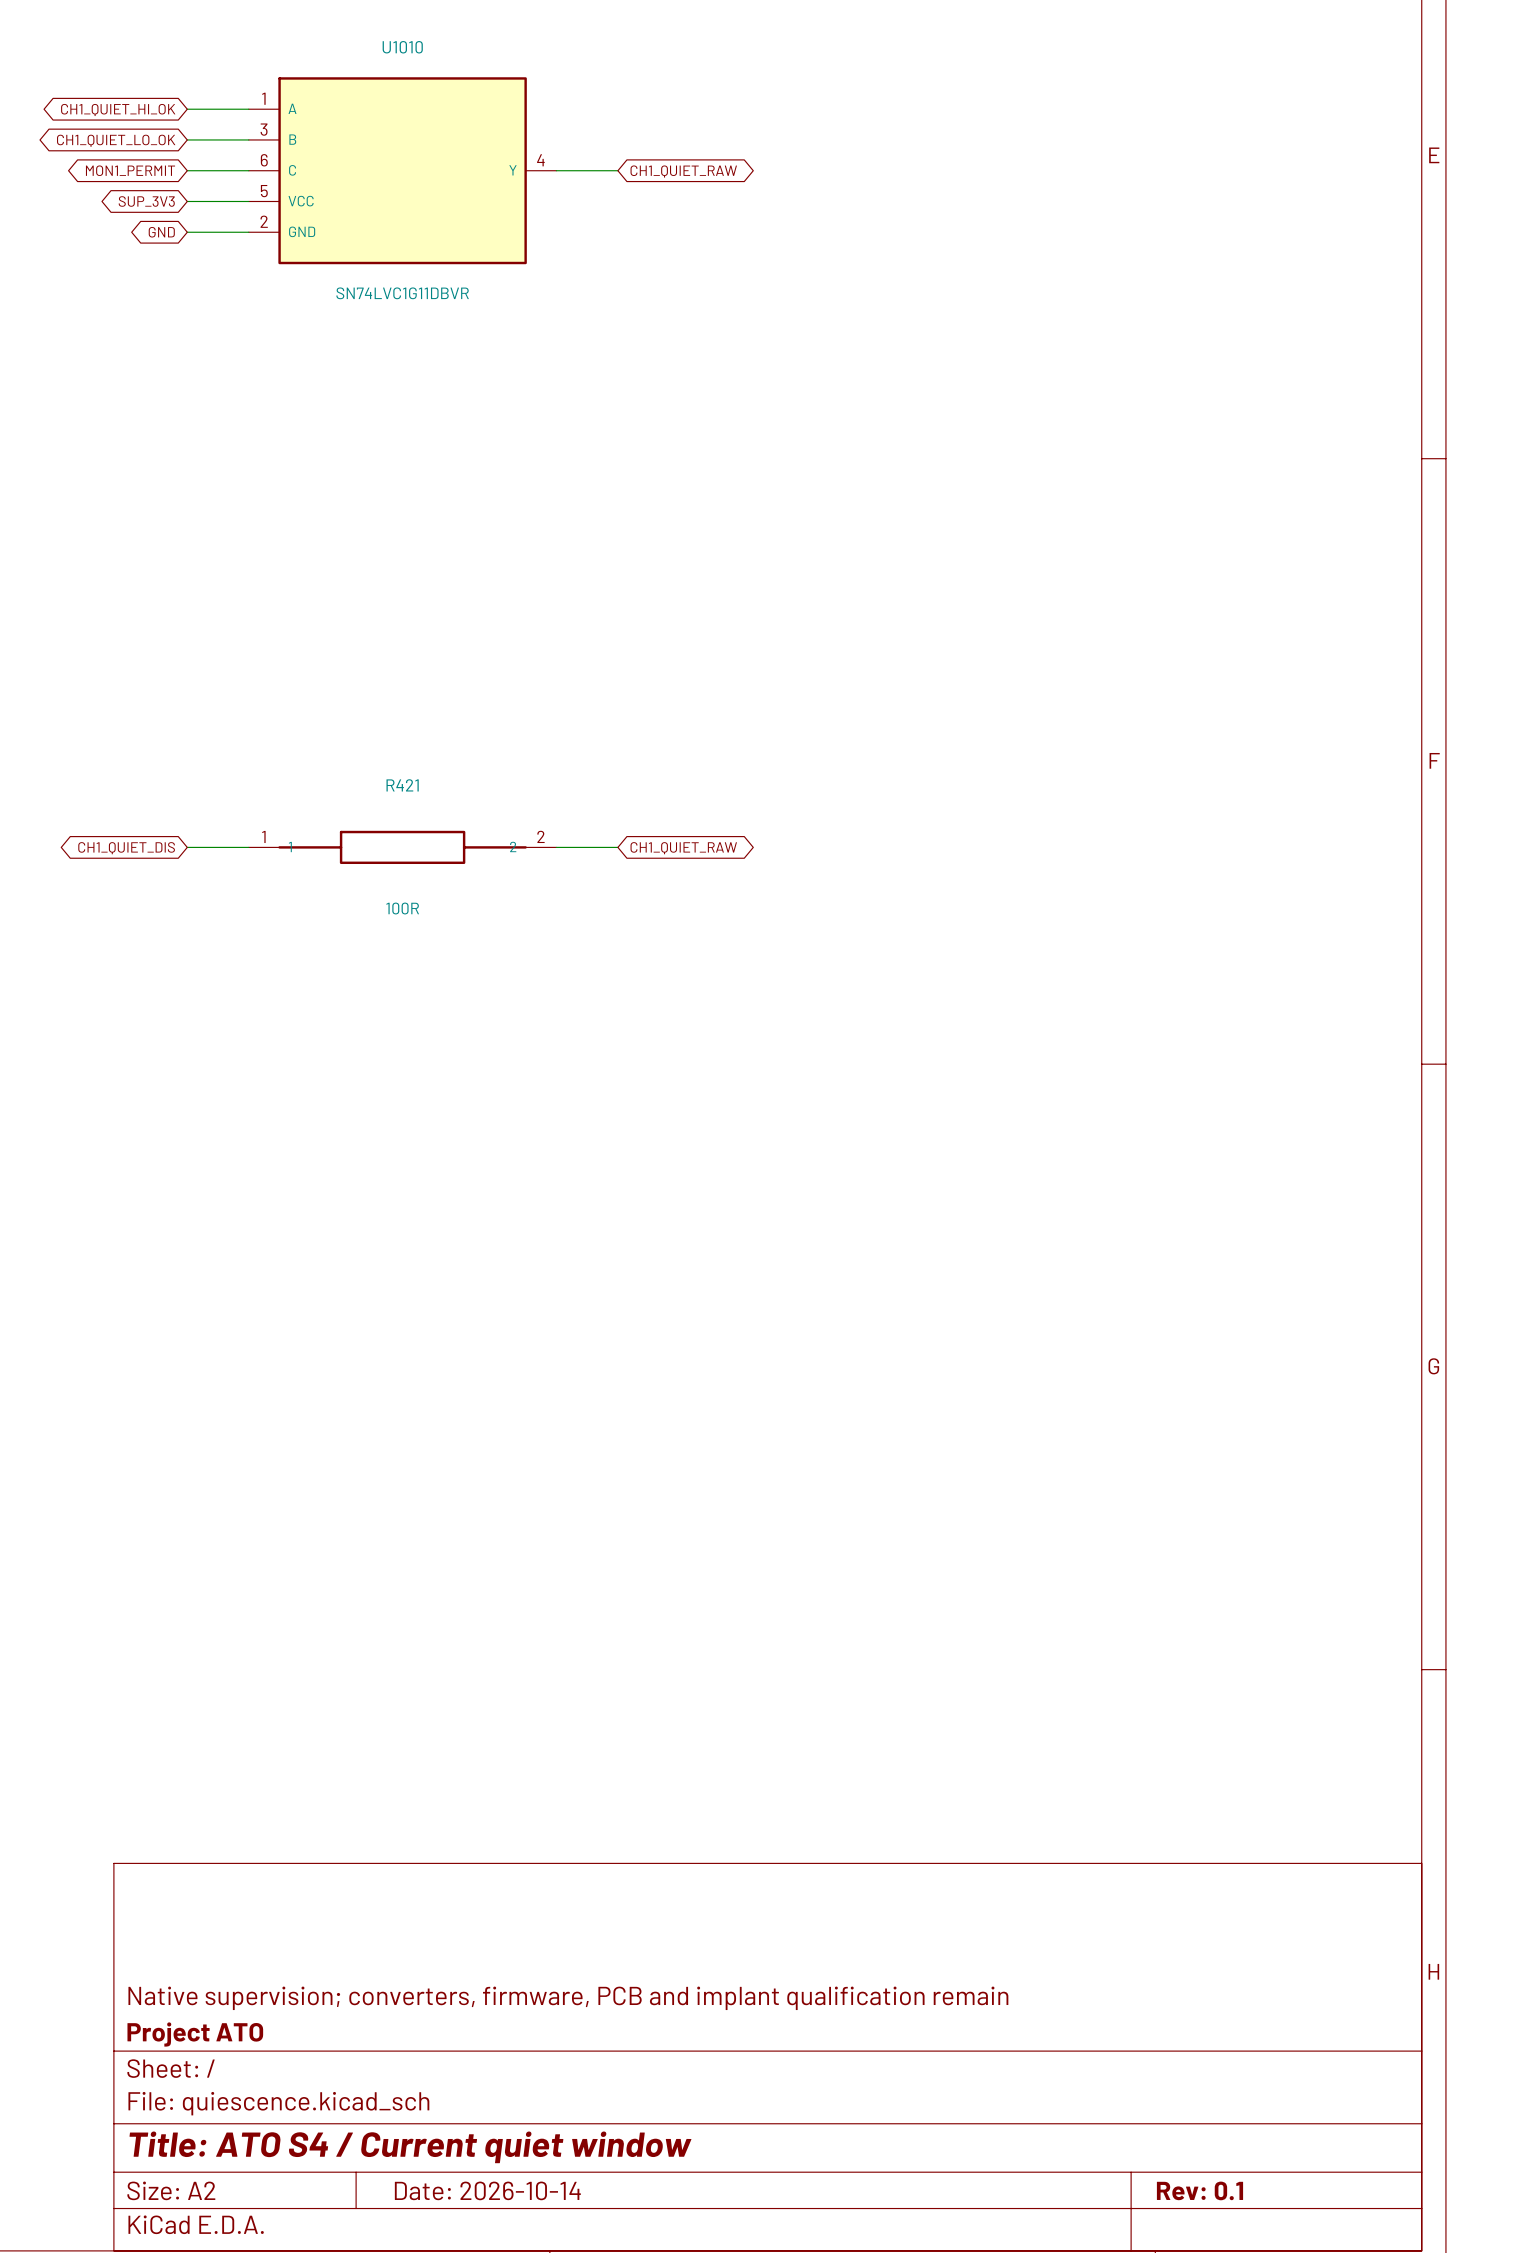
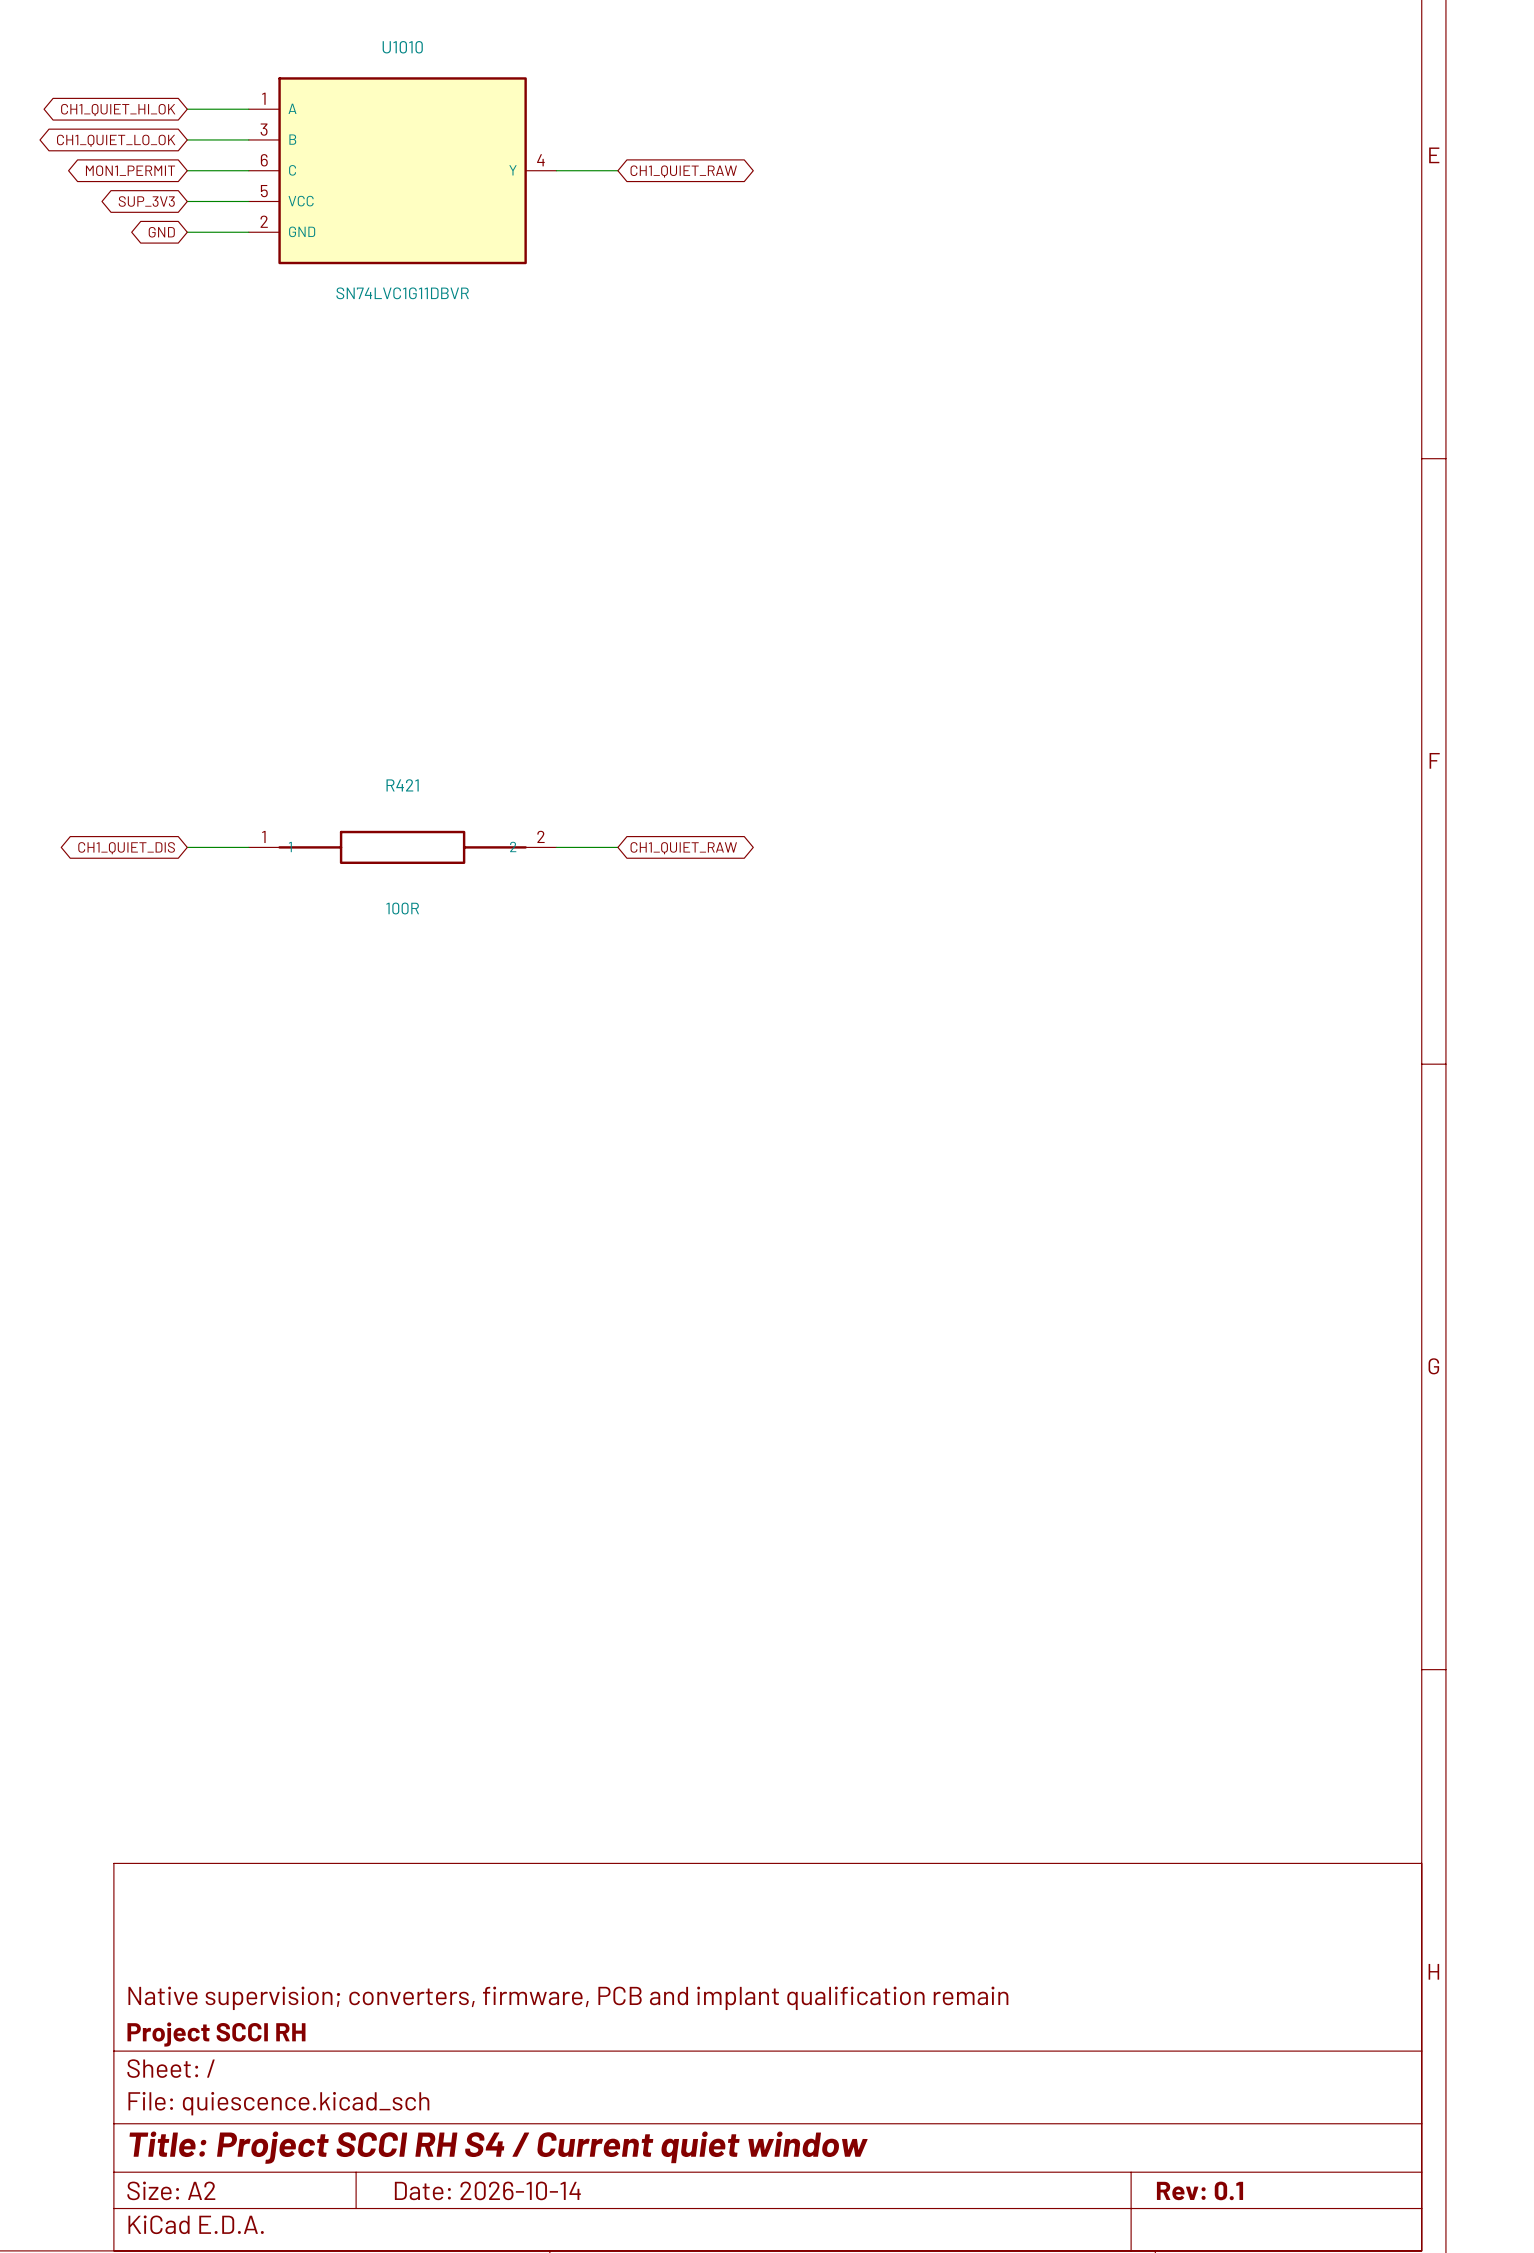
title block: Project ATO (195, 2034) -> Project SCCI RH (216, 2034)
title block: Title: ATO S4 / Current quiet window (410, 2147) -> Title: Project SCCI RH S4 / Current quiet window (498, 2147)

